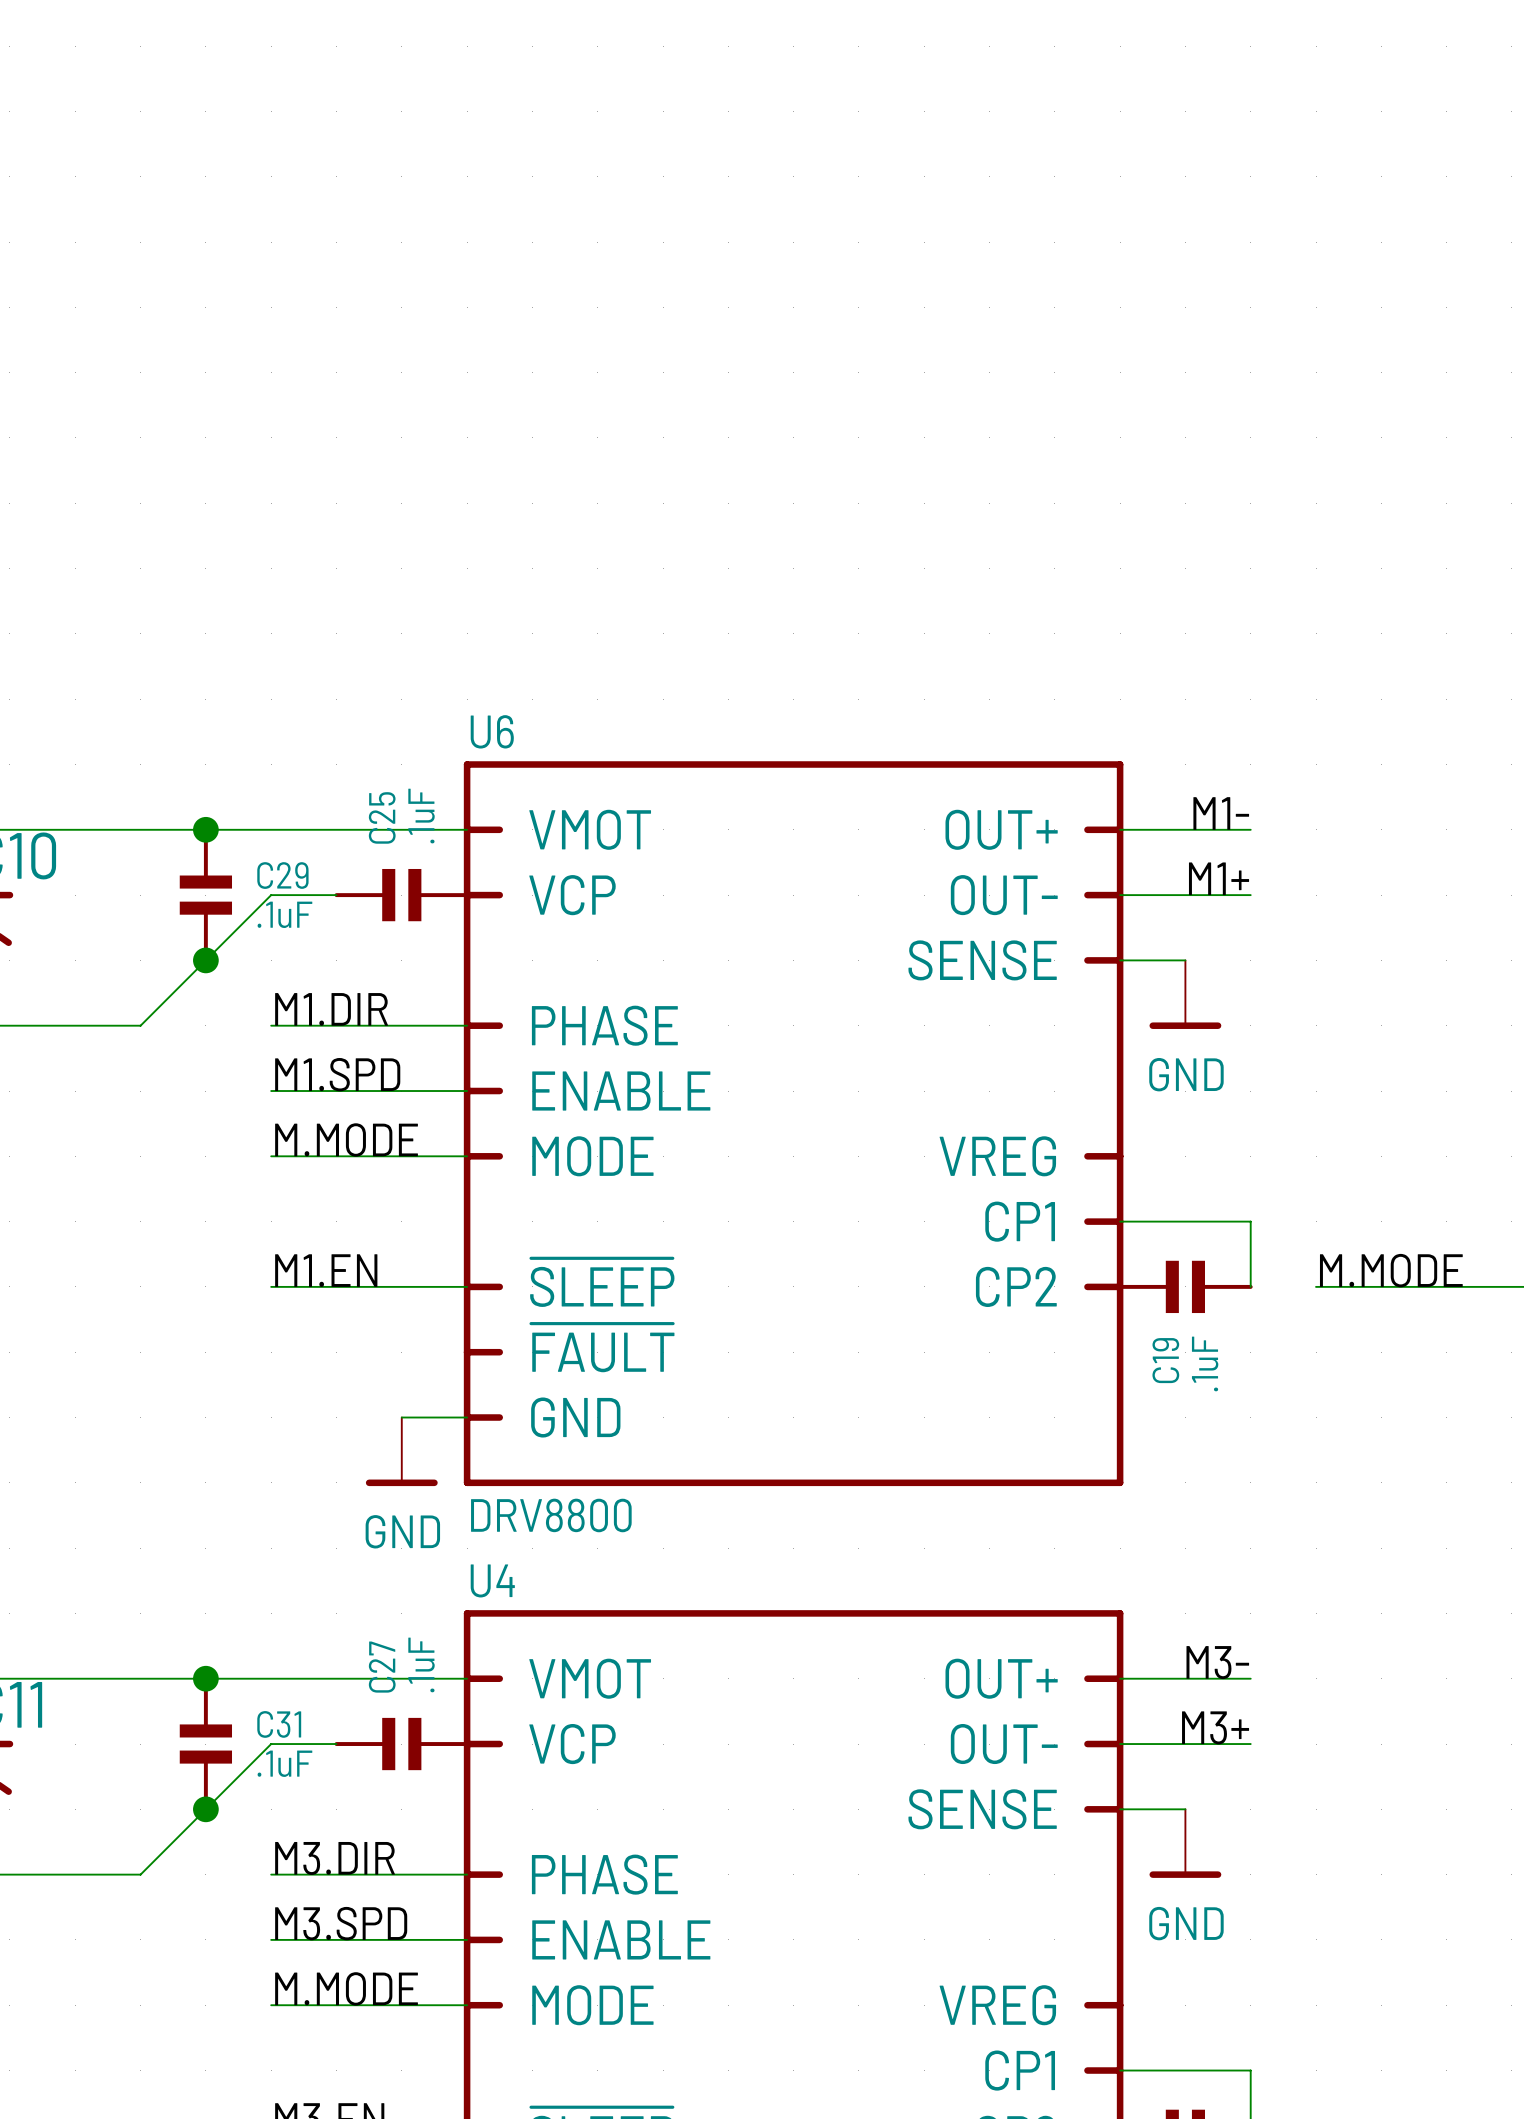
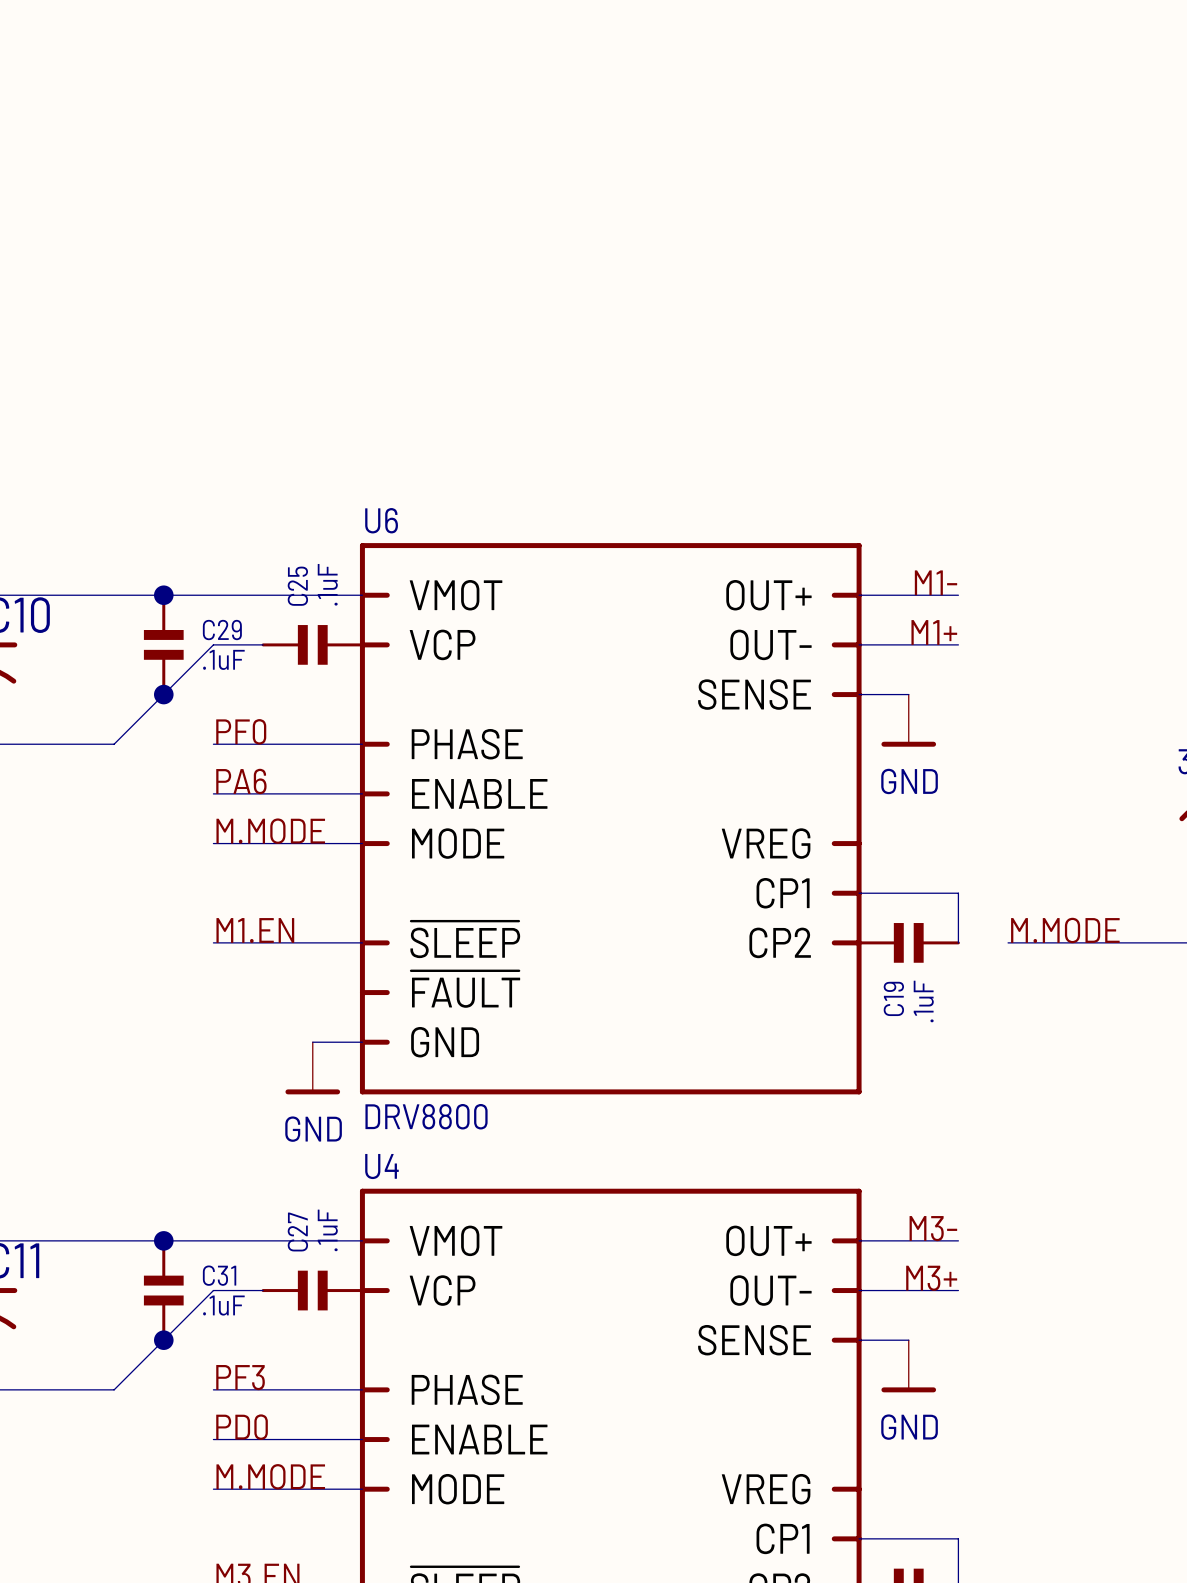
label: M1.DIR (331, 1009) -> PF0 (241, 731)
label: M1.SPD (337, 1074) -> PA6 (241, 781)
label: M3.DIR (335, 1858) -> PF3 (240, 1377)
label: M3.SPD (341, 1923) -> PD0 (242, 1427)

